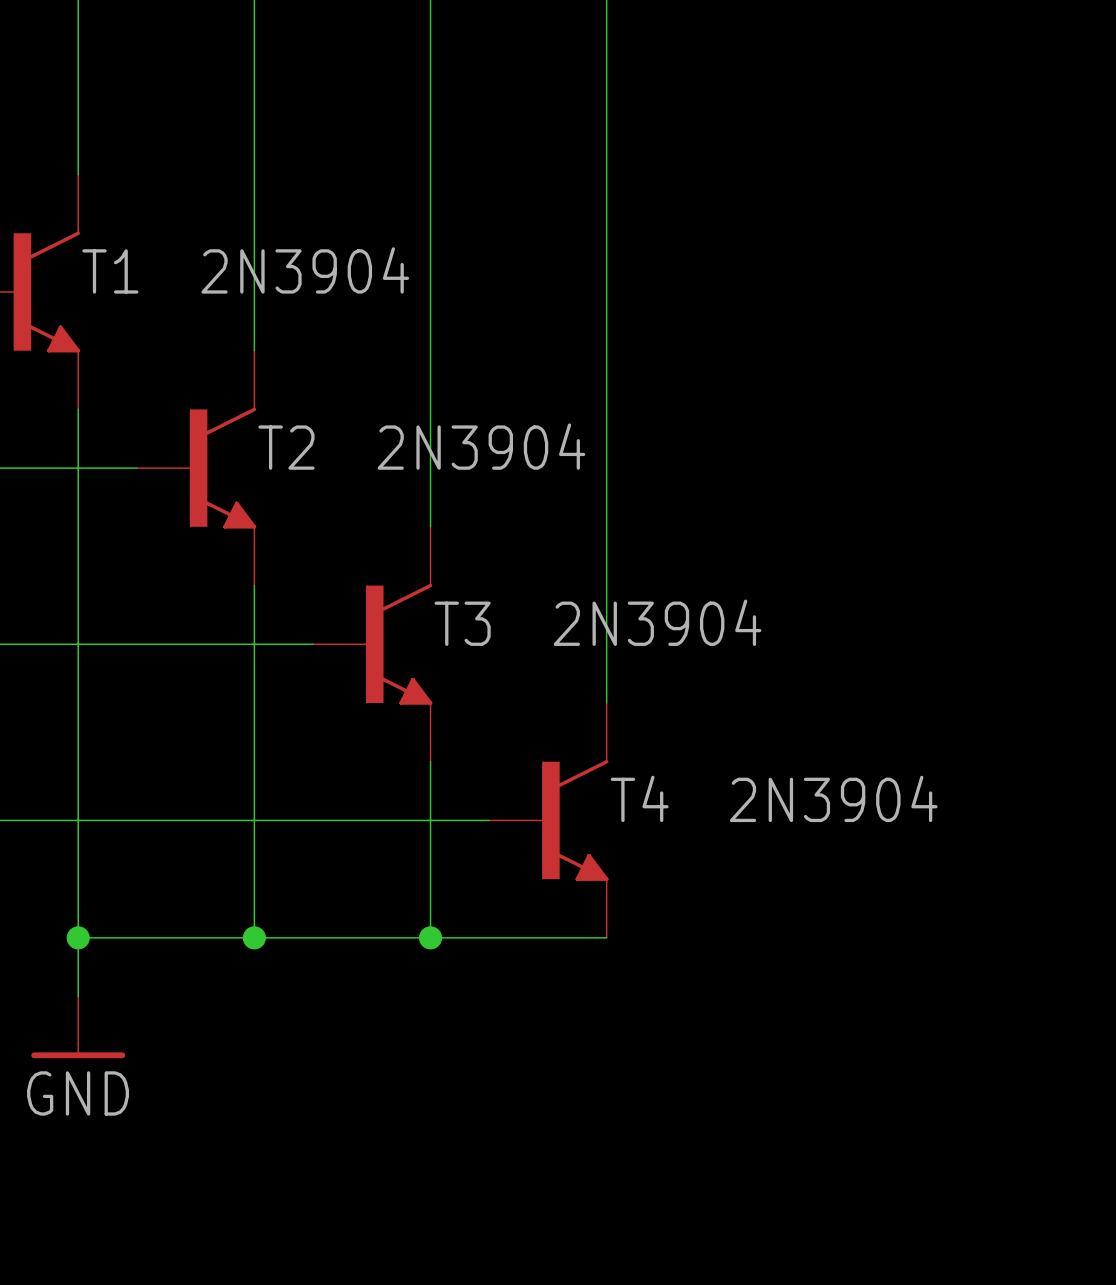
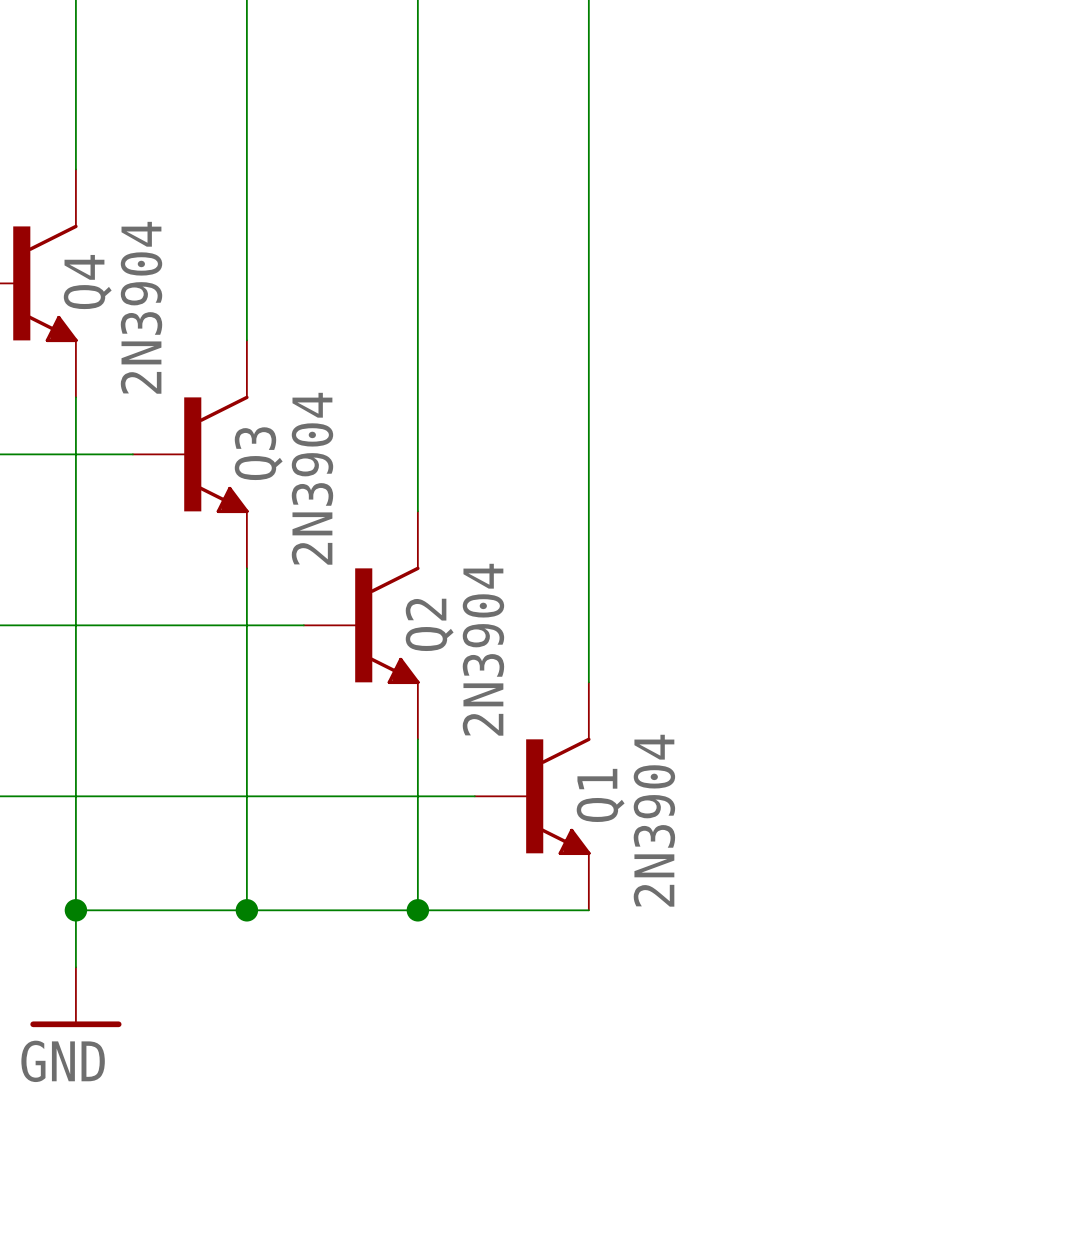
T1 value rotation: 0° (305, 270) -> 90° counterclockwise (141, 307)
T1 name: T1 (110, 271) -> Q4 (87, 282)
T2 value rotation: 0° (481, 446) -> 90° counterclockwise (312, 478)
T2 name: T2 (286, 447) -> Q3 (258, 453)
T3 value rotation: 0° (657, 622) -> 90° counterclockwise (483, 649)
T3 name: T3 (462, 623) -> Q2 (429, 624)
T4 name: T4 (639, 798) -> Q1 (600, 795)
T4 value rotation: 0° (833, 798) -> 90° counterclockwise (654, 820)

